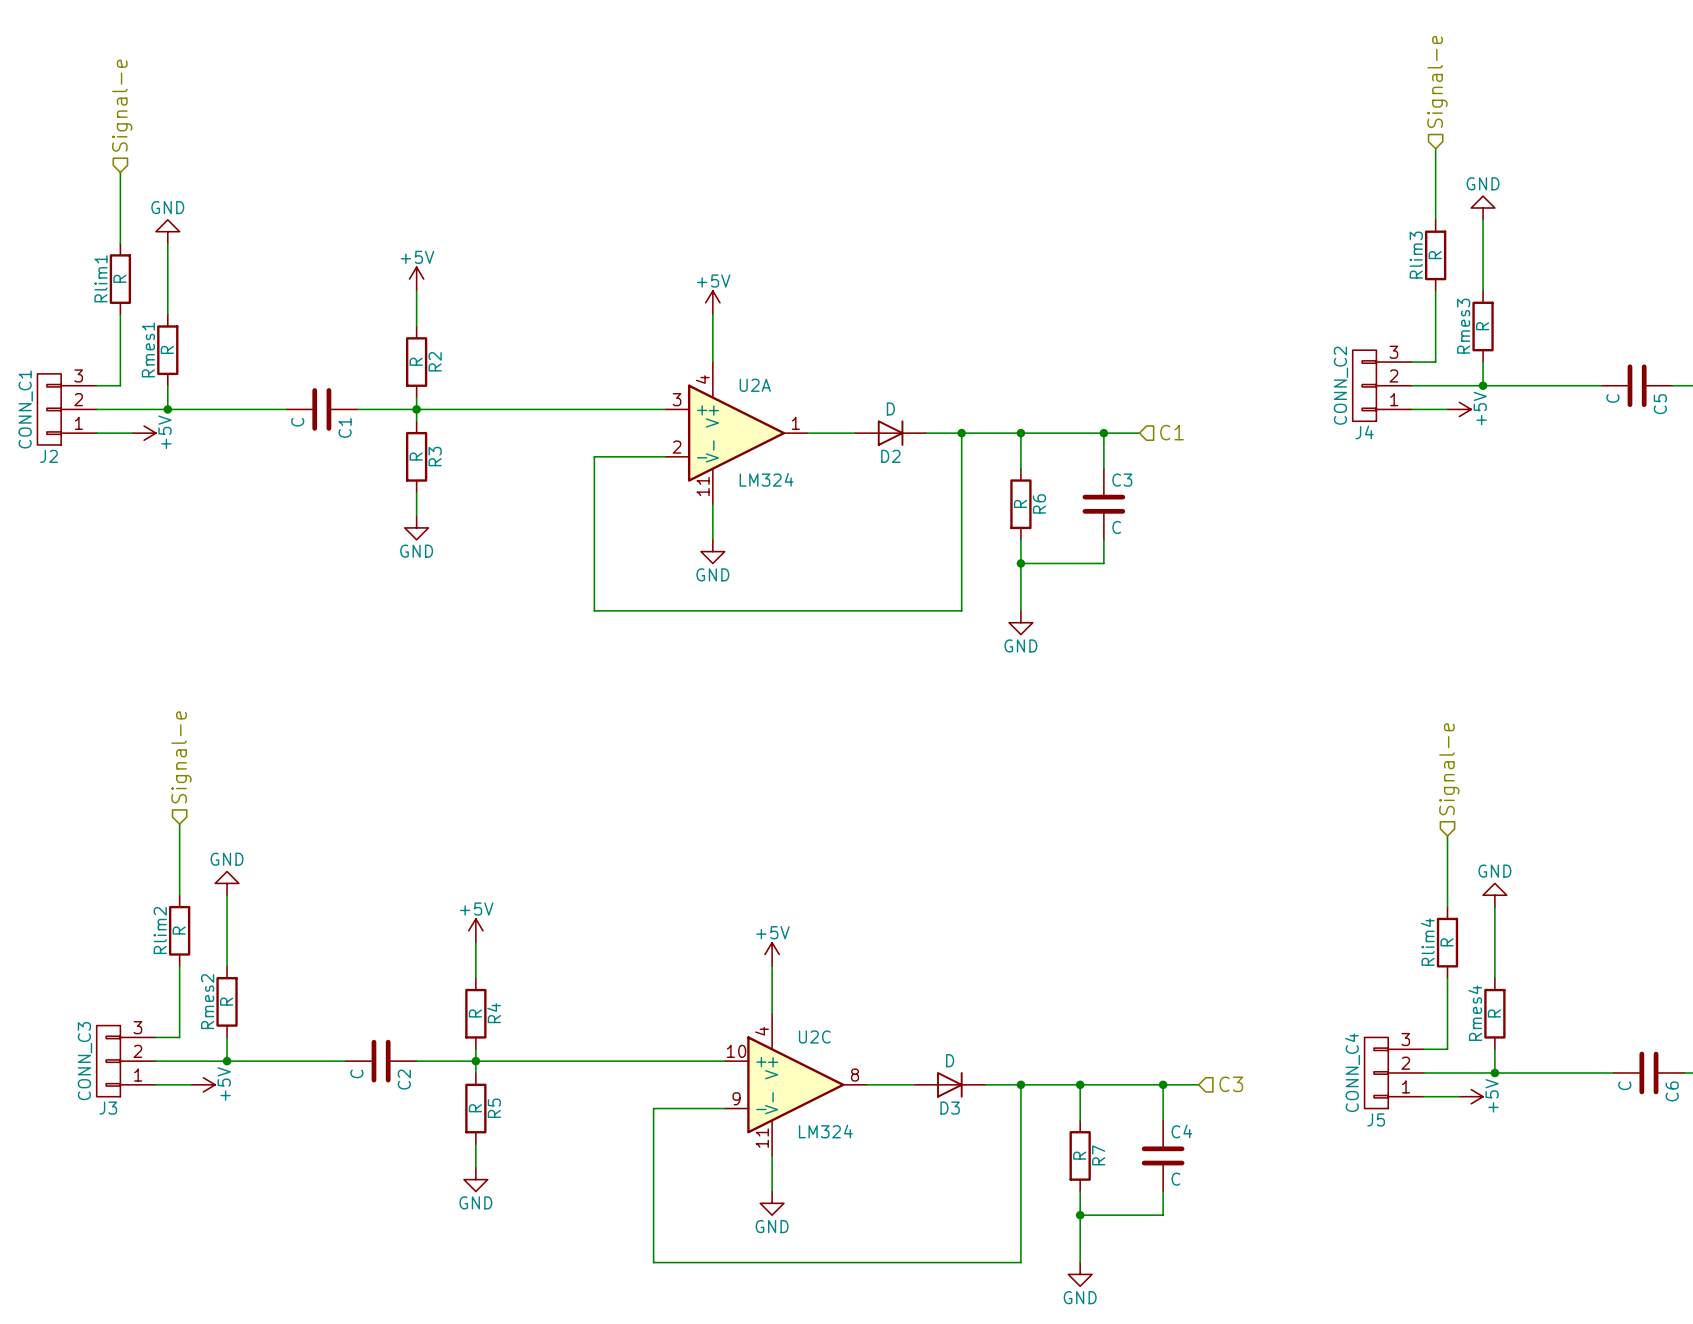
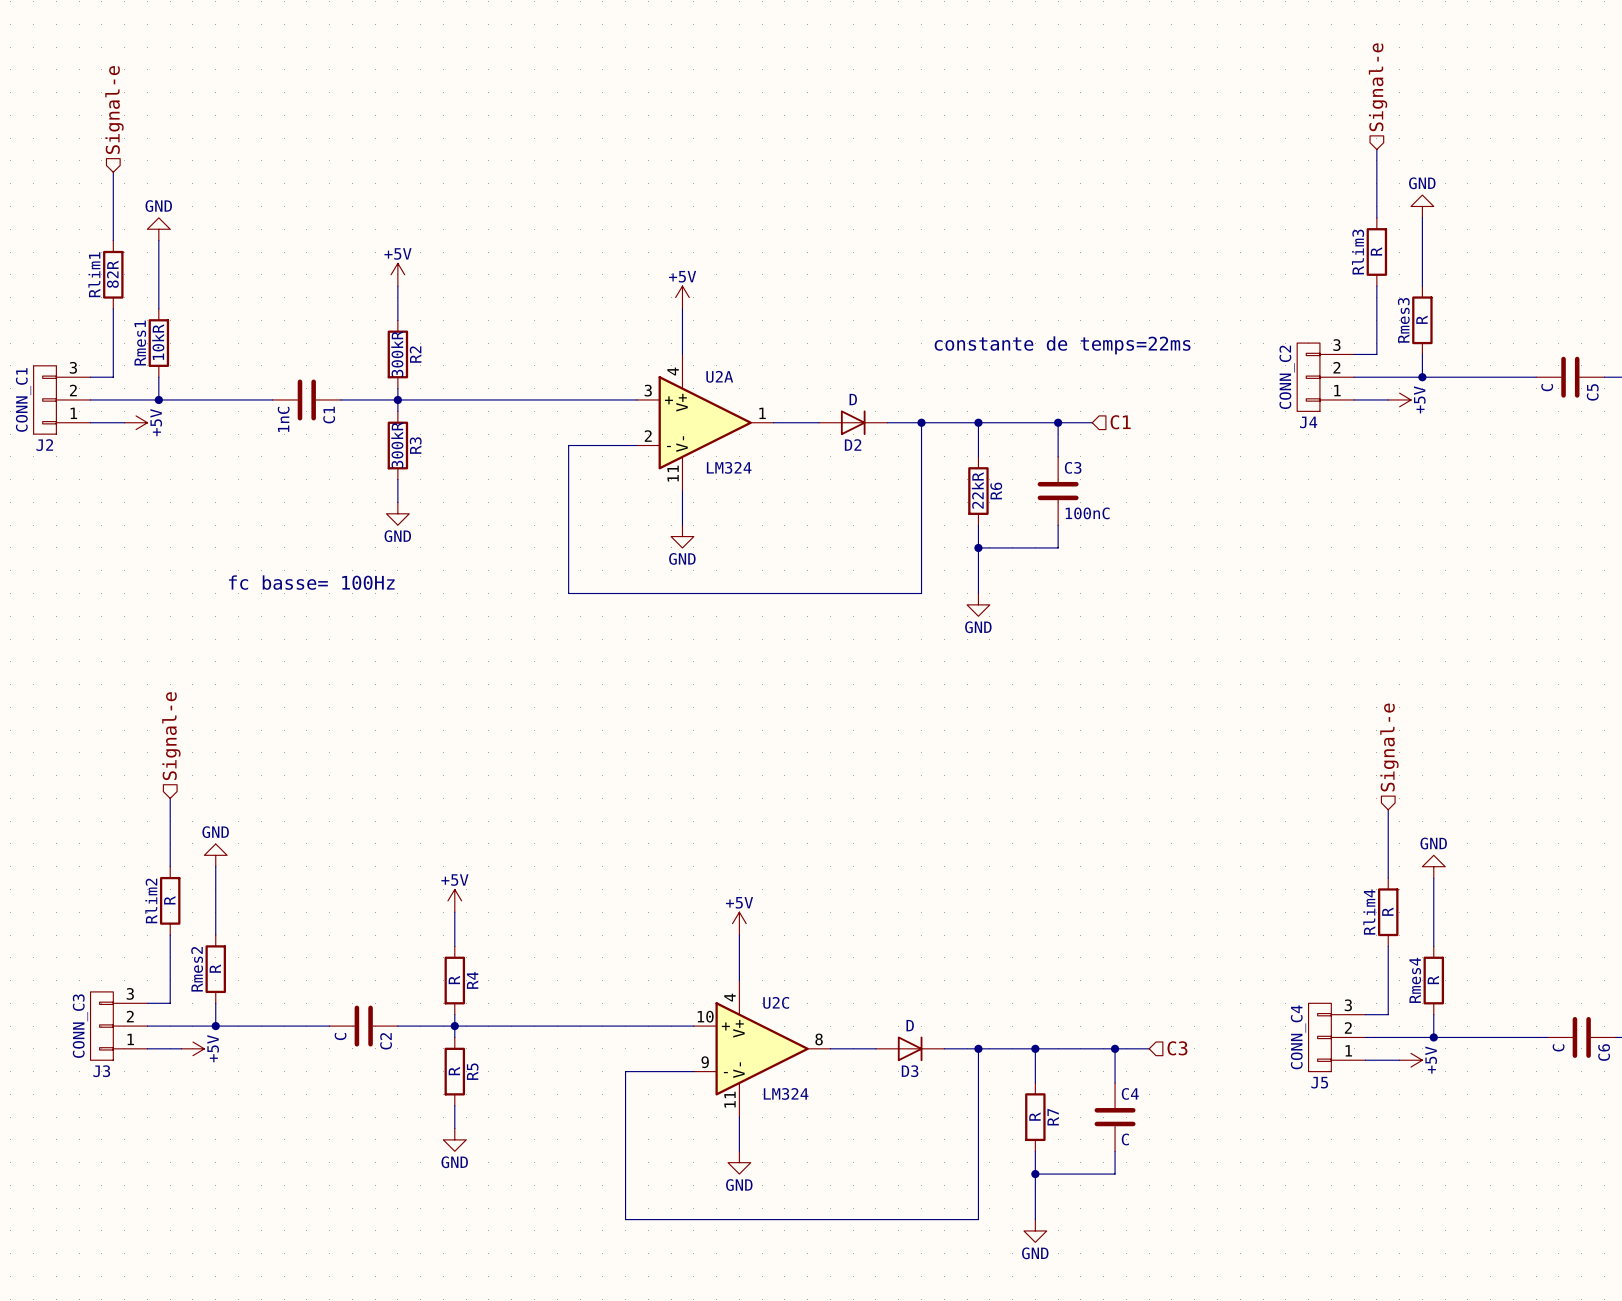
Rlim1 value: R (119, 278) -> 82R (112, 274)
Rmes1 value: R (167, 349) -> 10kR (158, 342)
text: none -> constante de temps=22ms (1062, 345)
R2 value: R (416, 361) -> 300kR (397, 353)
C1 value: C (297, 422) -> 1nC (283, 419)
R3 value: R (416, 456) -> 300kR (397, 444)
R6 value: R (1020, 503) -> 22kR (977, 490)
C3 value: C (1116, 527) -> 100nC (1087, 513)
text: none -> fc basse= 100Hz (311, 582)

